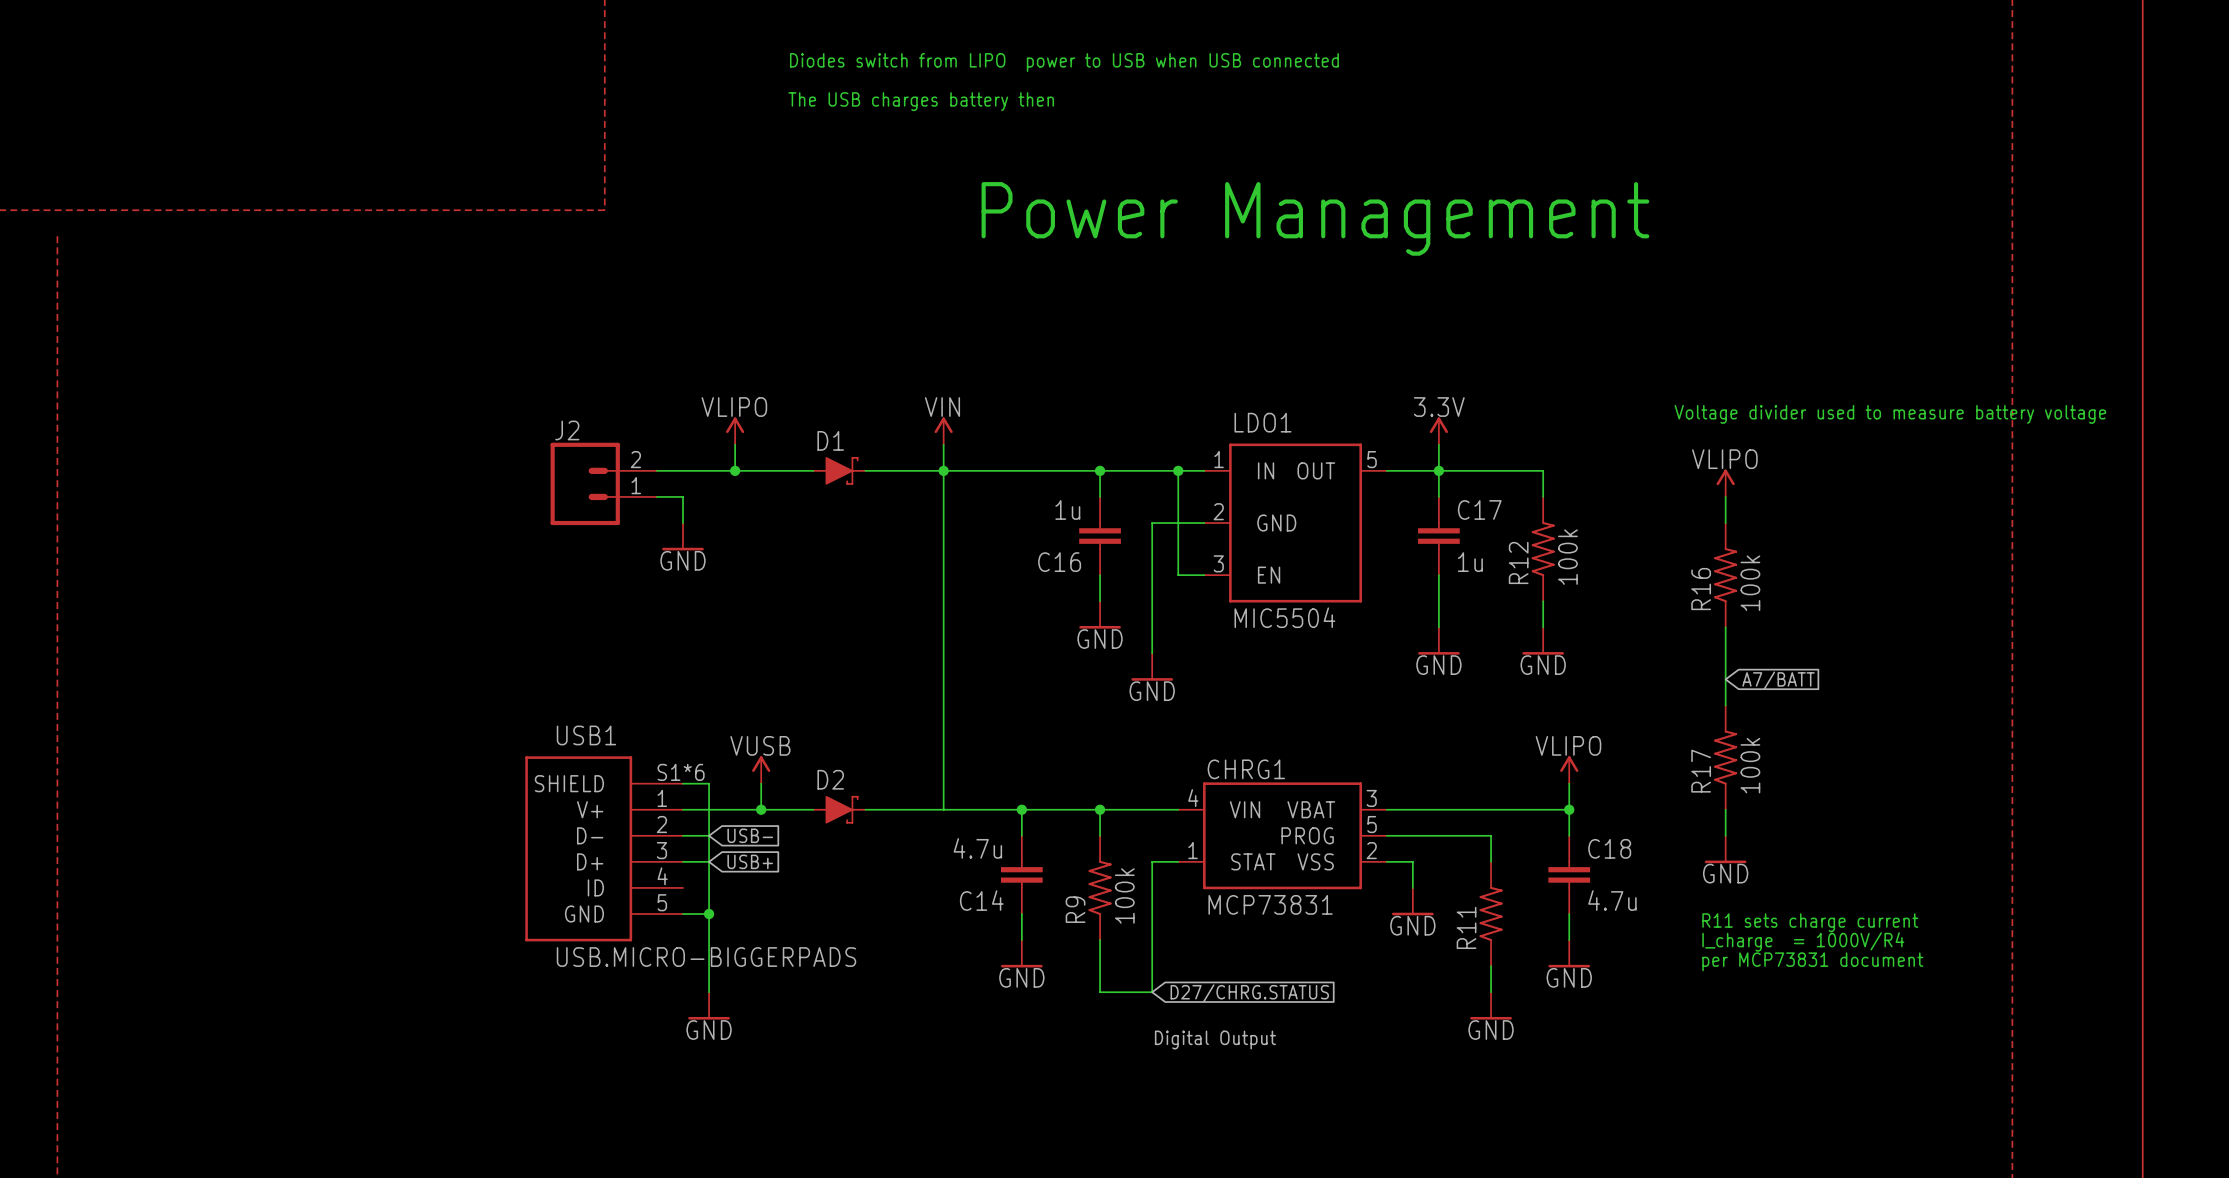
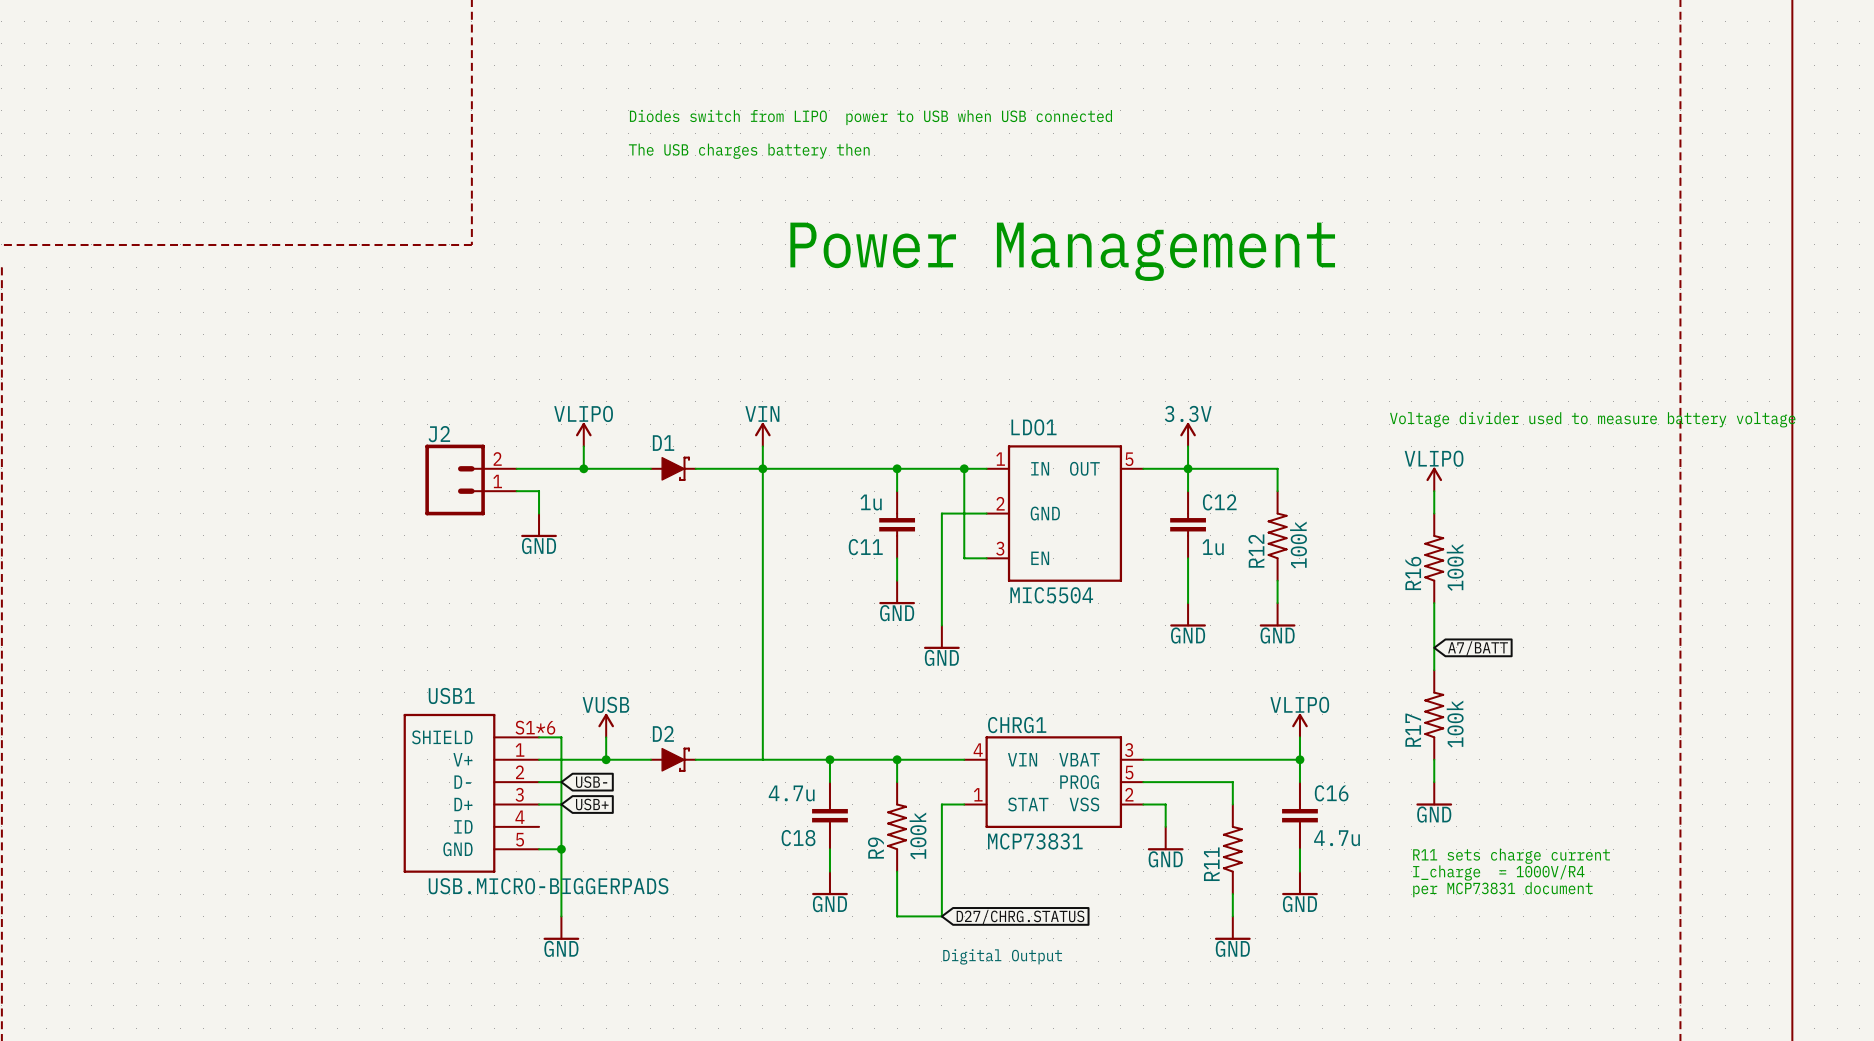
C17 name: C17 (1479, 509) -> C12 (1219, 502)
C16 name: C16 (1059, 562) -> C11 (865, 547)
C18 name: C18 (1609, 848) -> C16 (1331, 793)
C14 name: C14 (981, 900) -> C18 (798, 838)

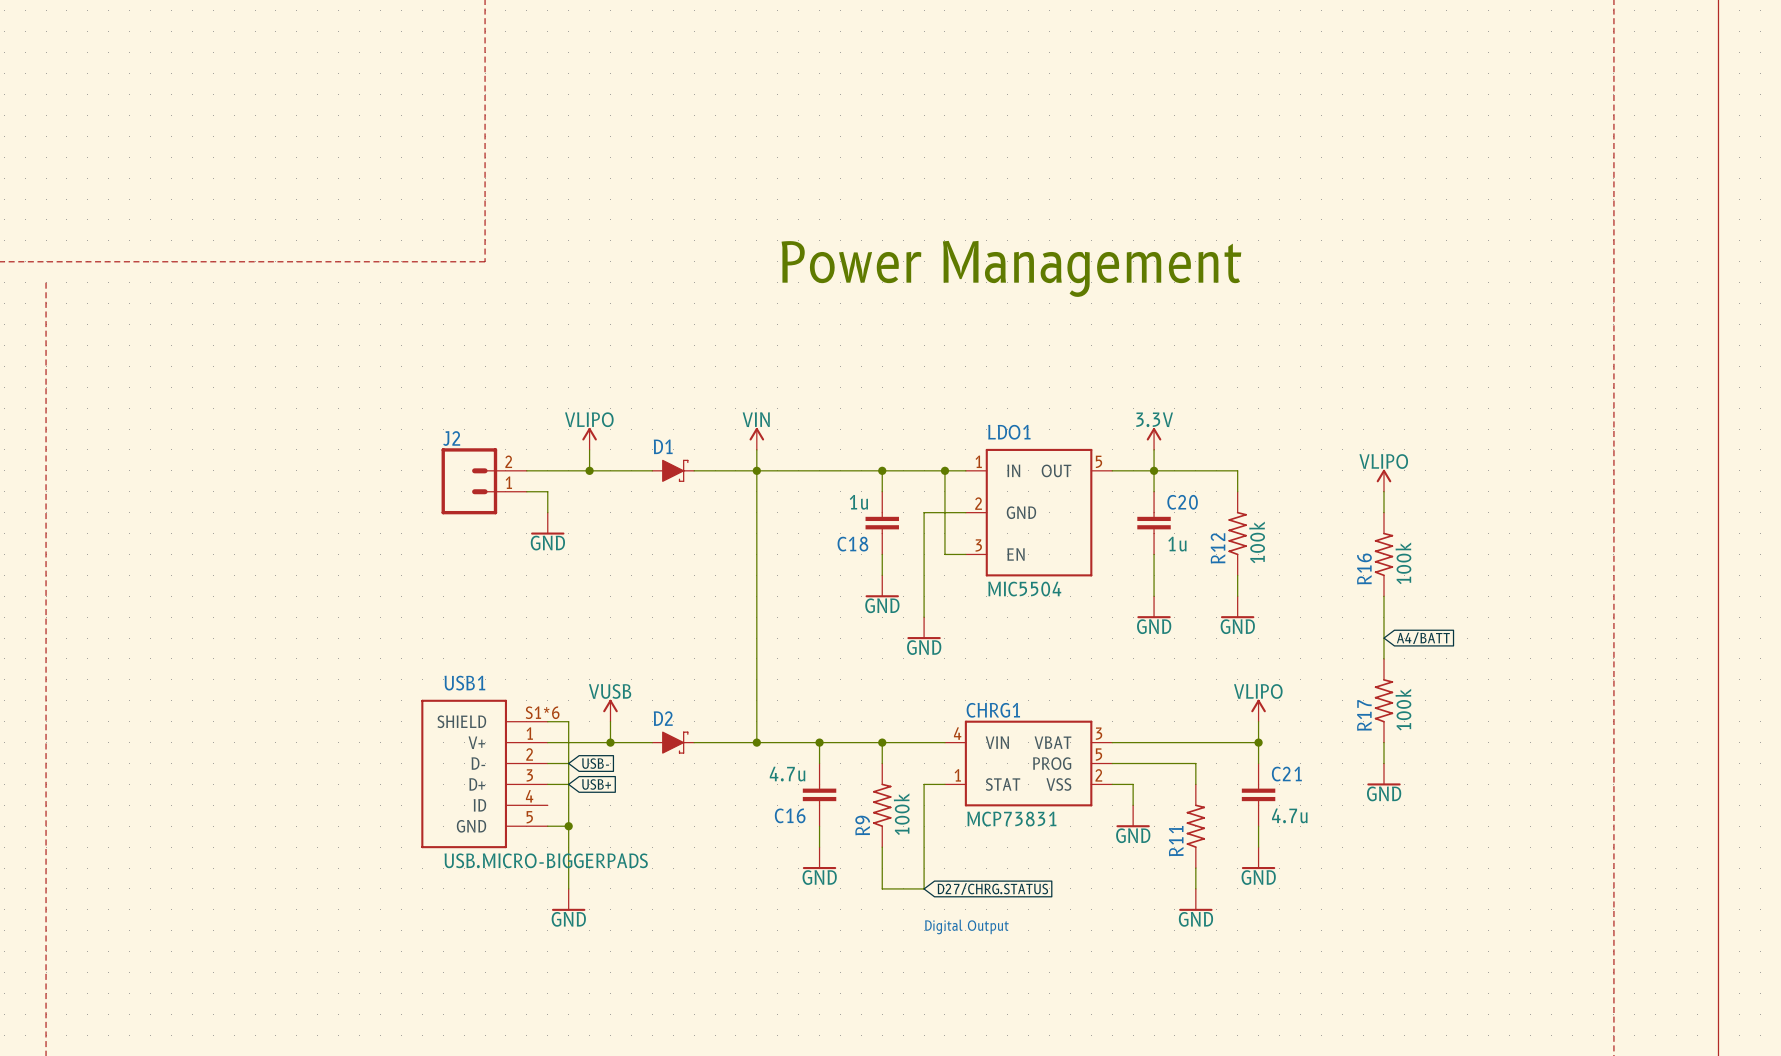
text: Diodes switch from LIPO power to USB when USB connected (870, 117) -> none
text: The USB charges battery then (749, 151) -> none
text: Voltage divider used to measure battery voltage (1592, 419) -> none
C12 name: C12 (1219, 502) -> C20 (1182, 502)
C11 name: C11 (865, 547) -> C18 (852, 544)
global label: A7/BATT (1478, 648) -> A4/BATT (1423, 638)
junction: none -> (756, 742)
C16 name: C16 (1331, 793) -> C21 (1286, 774)
C18 name: C18 (798, 838) -> C16 (790, 815)
text: R11 sets charge current (1511, 856) -> none
text: I_charge = 1000V/R4 (1498, 872) -> none
text: per MCP73831 document (1502, 889) -> none

